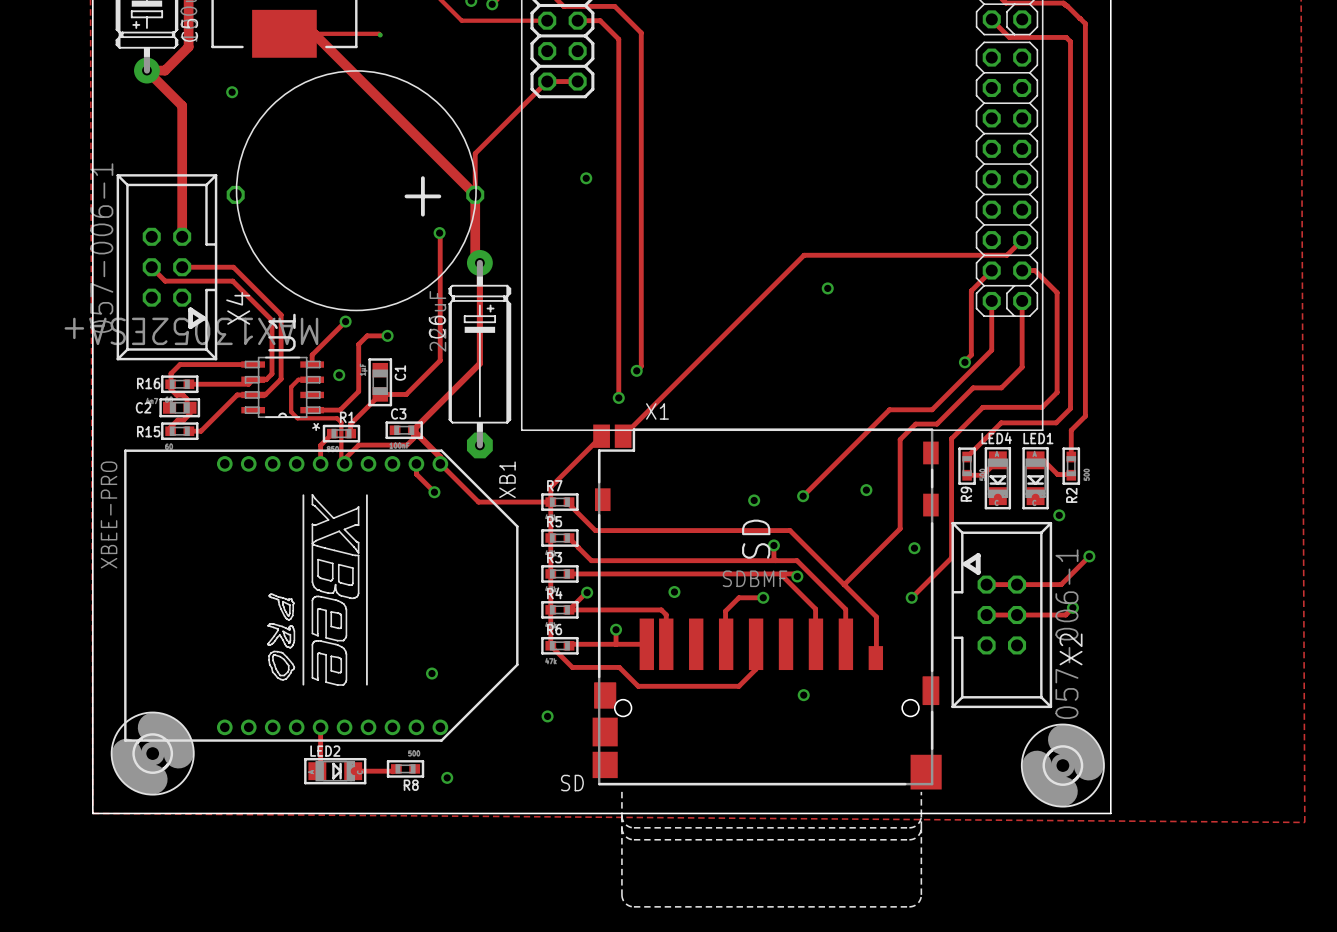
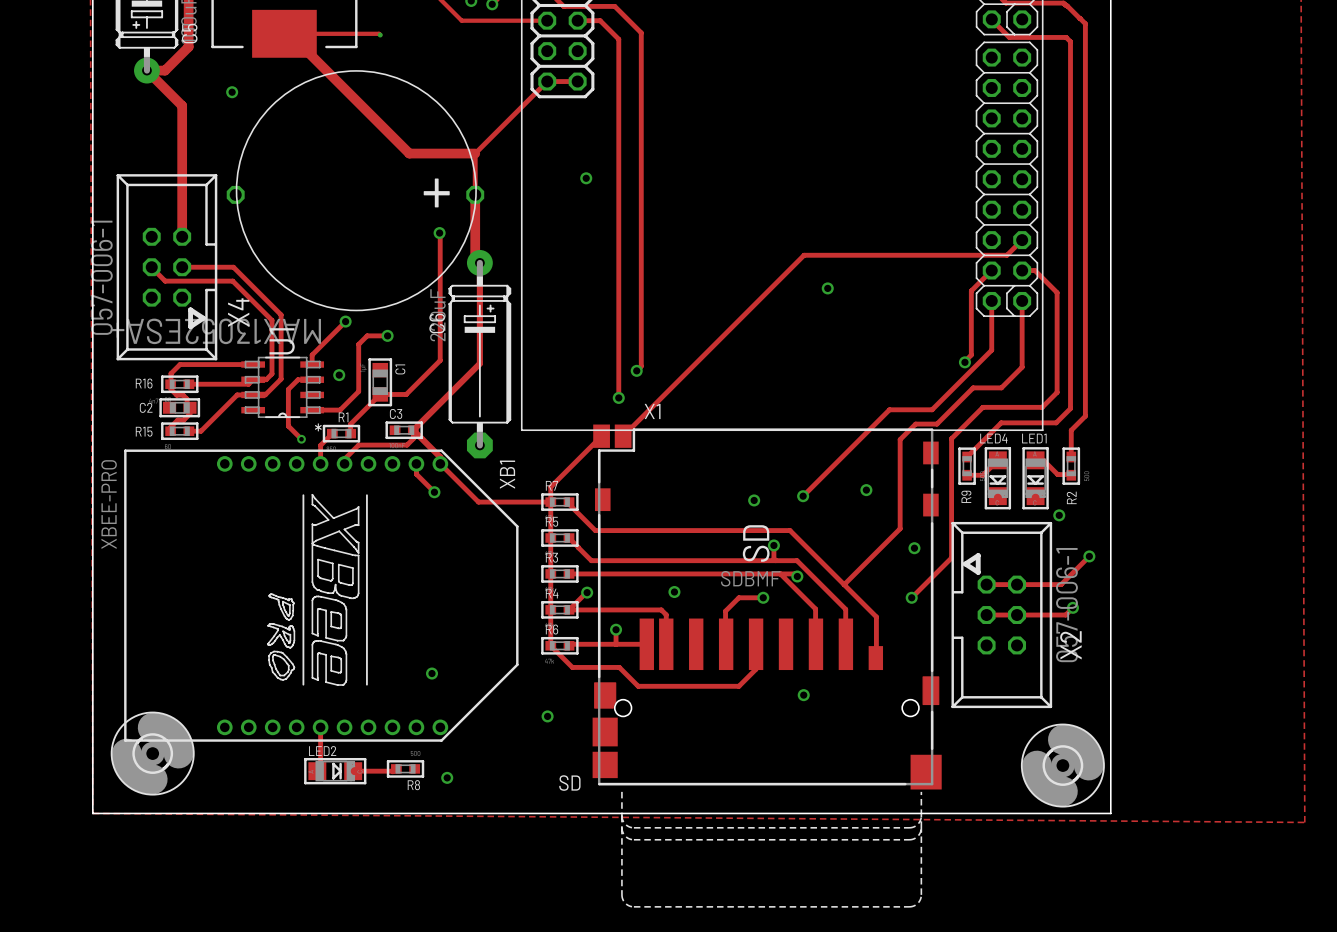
track: (284, 33) (314, 33) (475, 194) -> (284, 33) (290, 34) (409, 153) (475, 153)
track: (298, 379) (291, 386) (291, 411) (297, 418) (337, 418) (341, 422) (341, 460) (344, 463) -> (298, 379) (288, 389) (288, 426) (301, 439)
via: none -> (301, 439)

